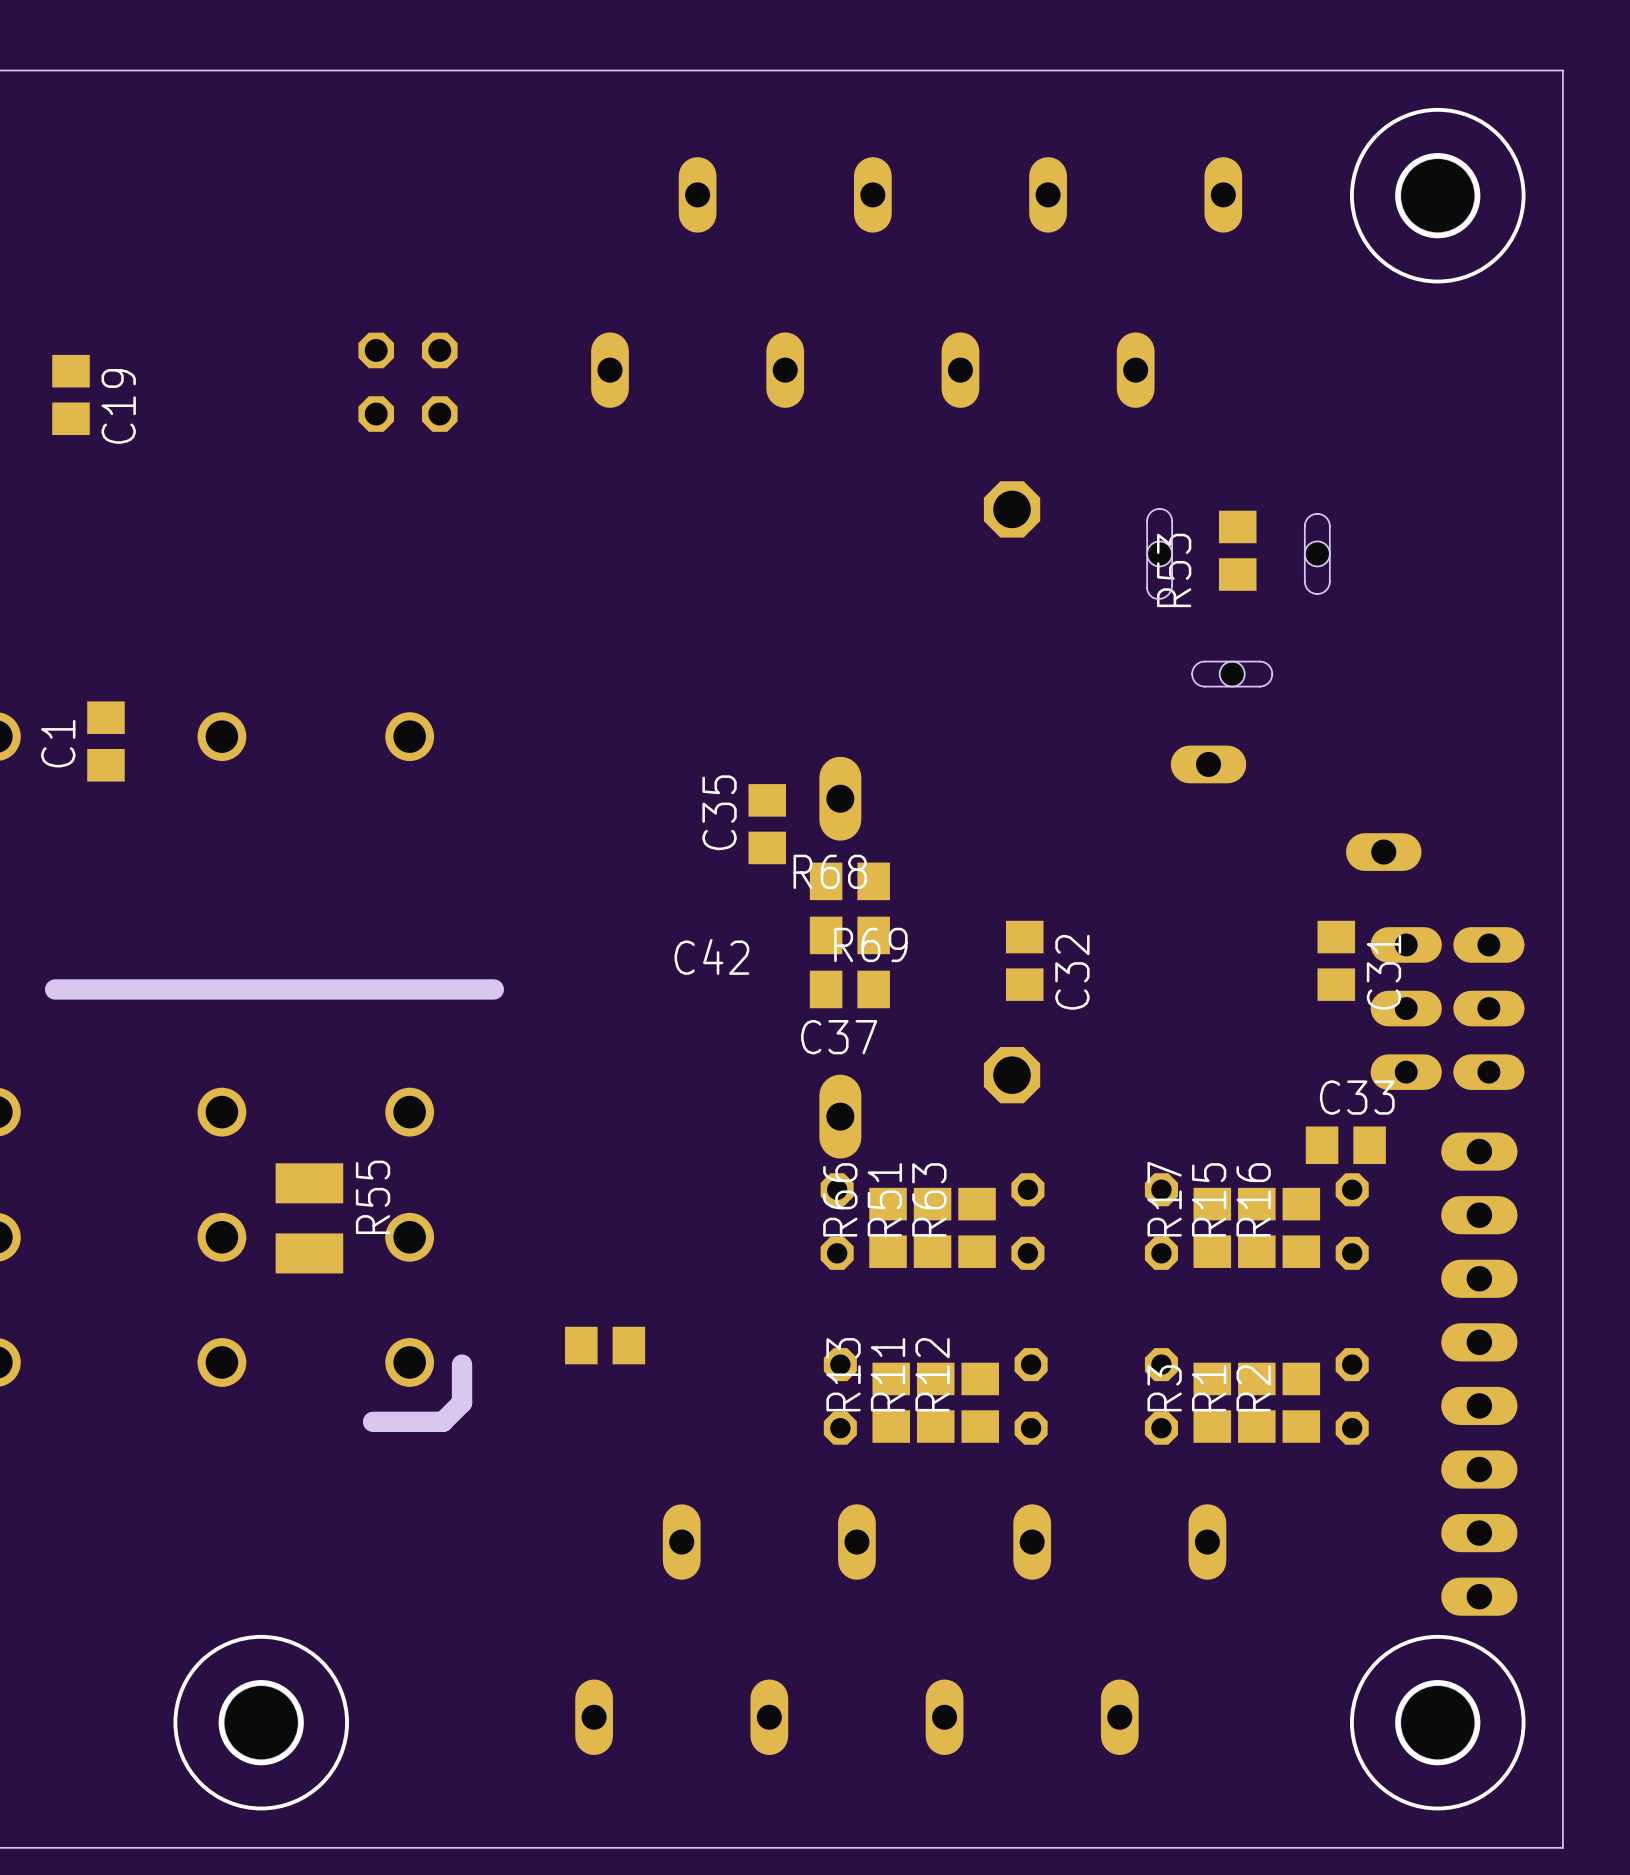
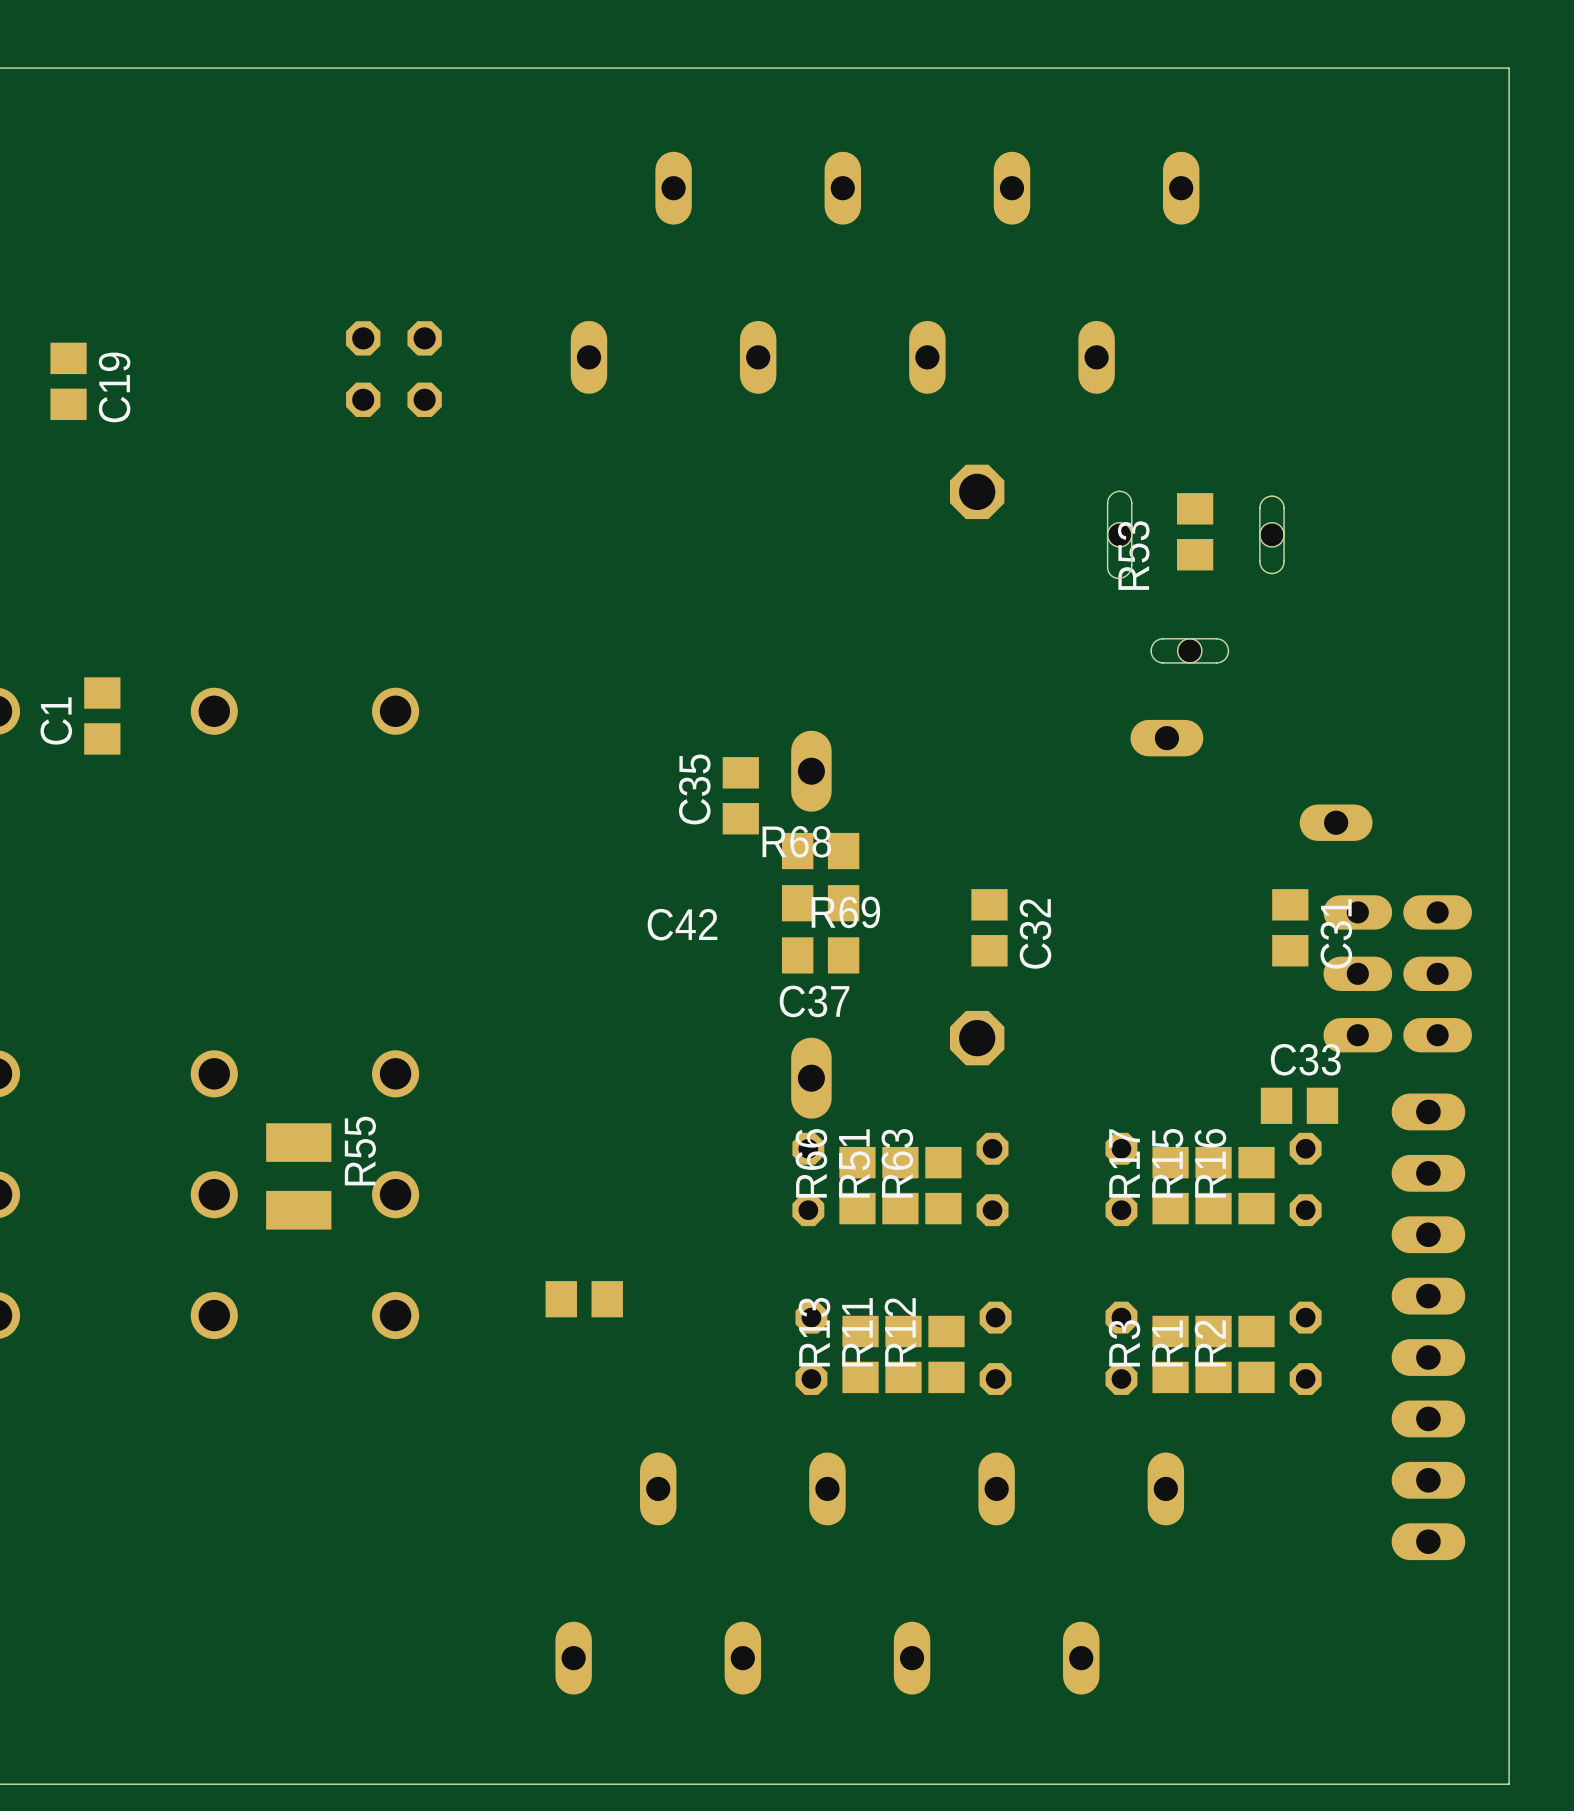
part: (1437, 195) -> none
board edge: (493, 989) (55, 989) -> none
board edge: (462, 1364) (462, 1402) (442, 1421) (373, 1421) -> none
part: (261, 1722) -> none
part: (1437, 1722) -> none

